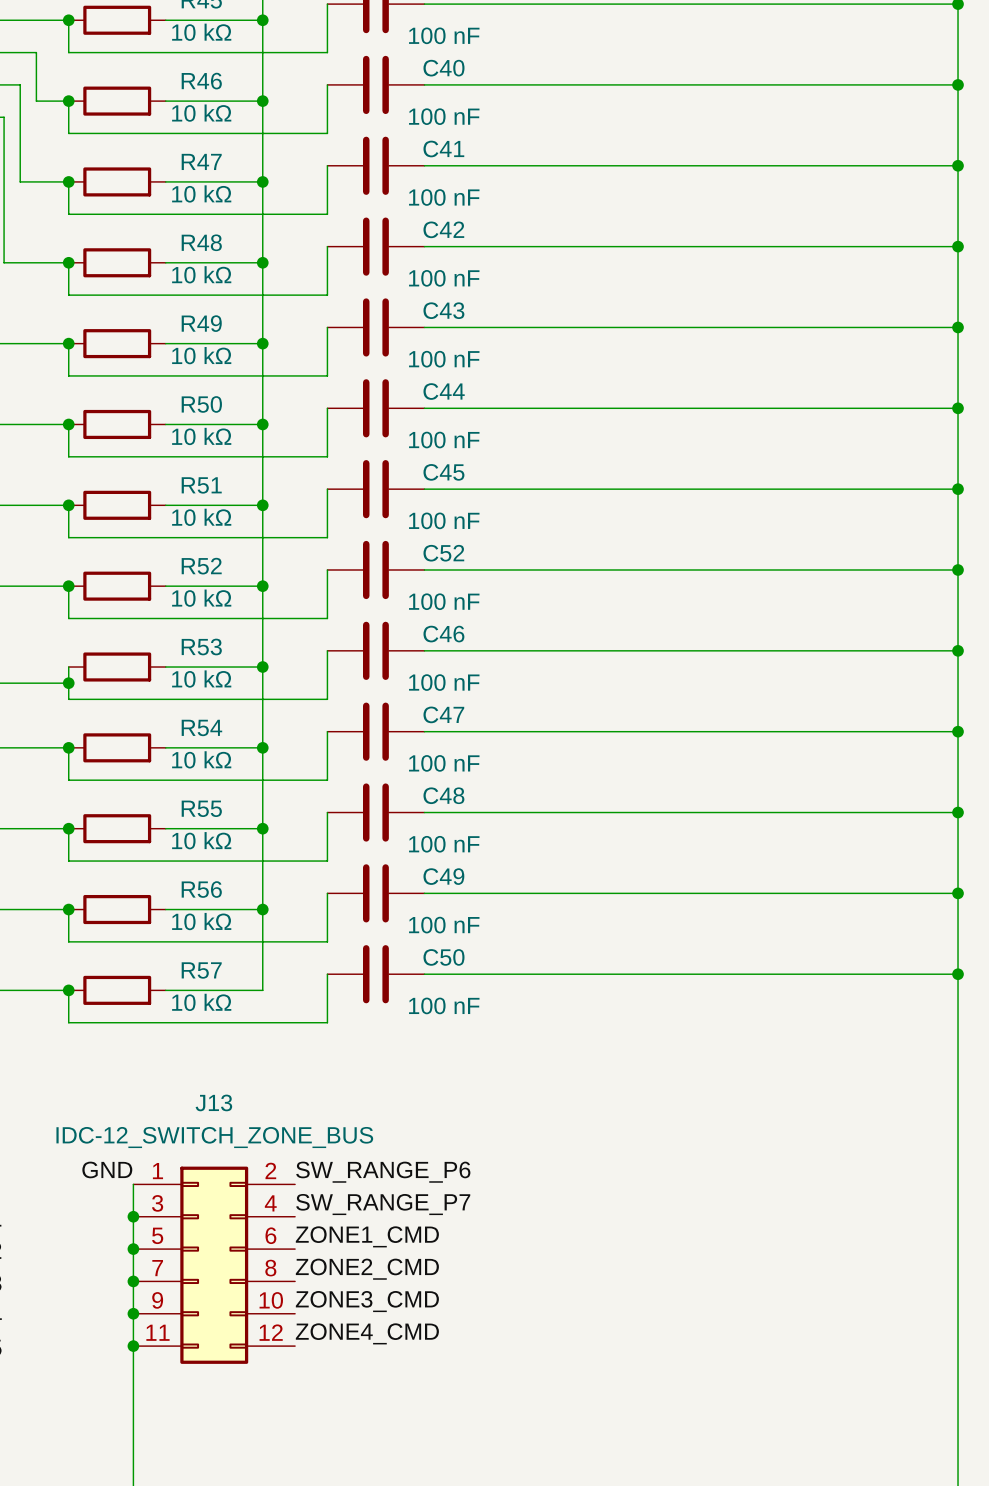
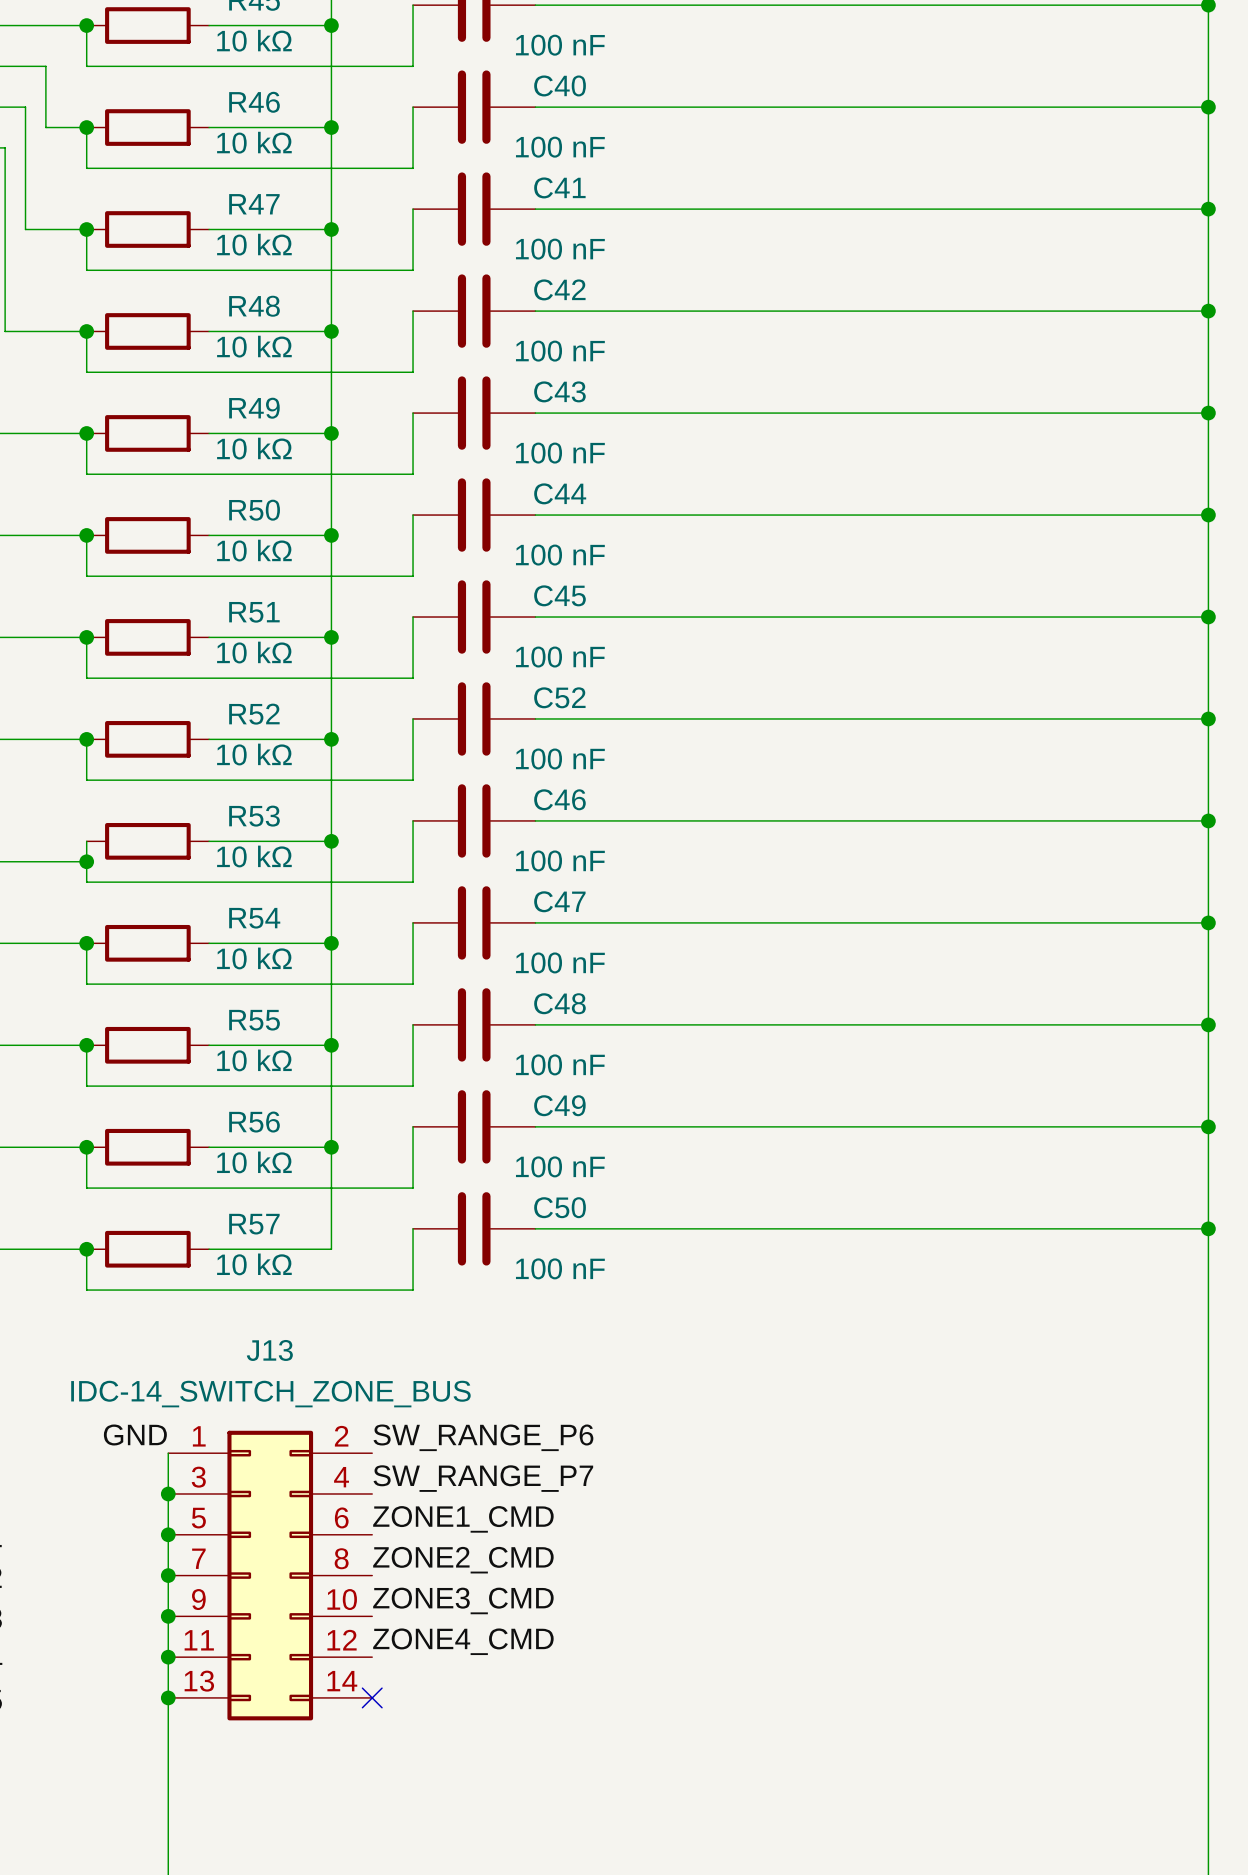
J13 value: IDC-12_SWITCH_ZONE_BUS (214, 1137) -> IDC-14_SWITCH_ZONE_BUS (270, 1394)
label: none -> SW_RANGE_P6 (483, 1437)
wire: none -> (168, 1453) (168, 1493)
J13 symbol: [133, 1166, 296, 1364] -> [168, 1430, 373, 1721]
label position: GND (107, 1169) -> GND (135, 1434)
label: SW_RANGE_P6 (383, 1172) -> SW_RANGE_P7 (483, 1478)
junction: none -> (168, 1493)
label: SW_RANGE_P7 (383, 1204) -> ZONE1_CMD (463, 1519)
label: ZONE1_CMD (367, 1236) -> ZONE2_CMD (463, 1560)
label: ZONE2_CMD (367, 1269) -> ZONE3_CMD (463, 1600)
label: ZONE3_CMD (367, 1301) -> ZONE4_CMD (463, 1641)
label: ZONE4_CMD (367, 1333) -> none
no-connect mark: none -> (372, 1697)

